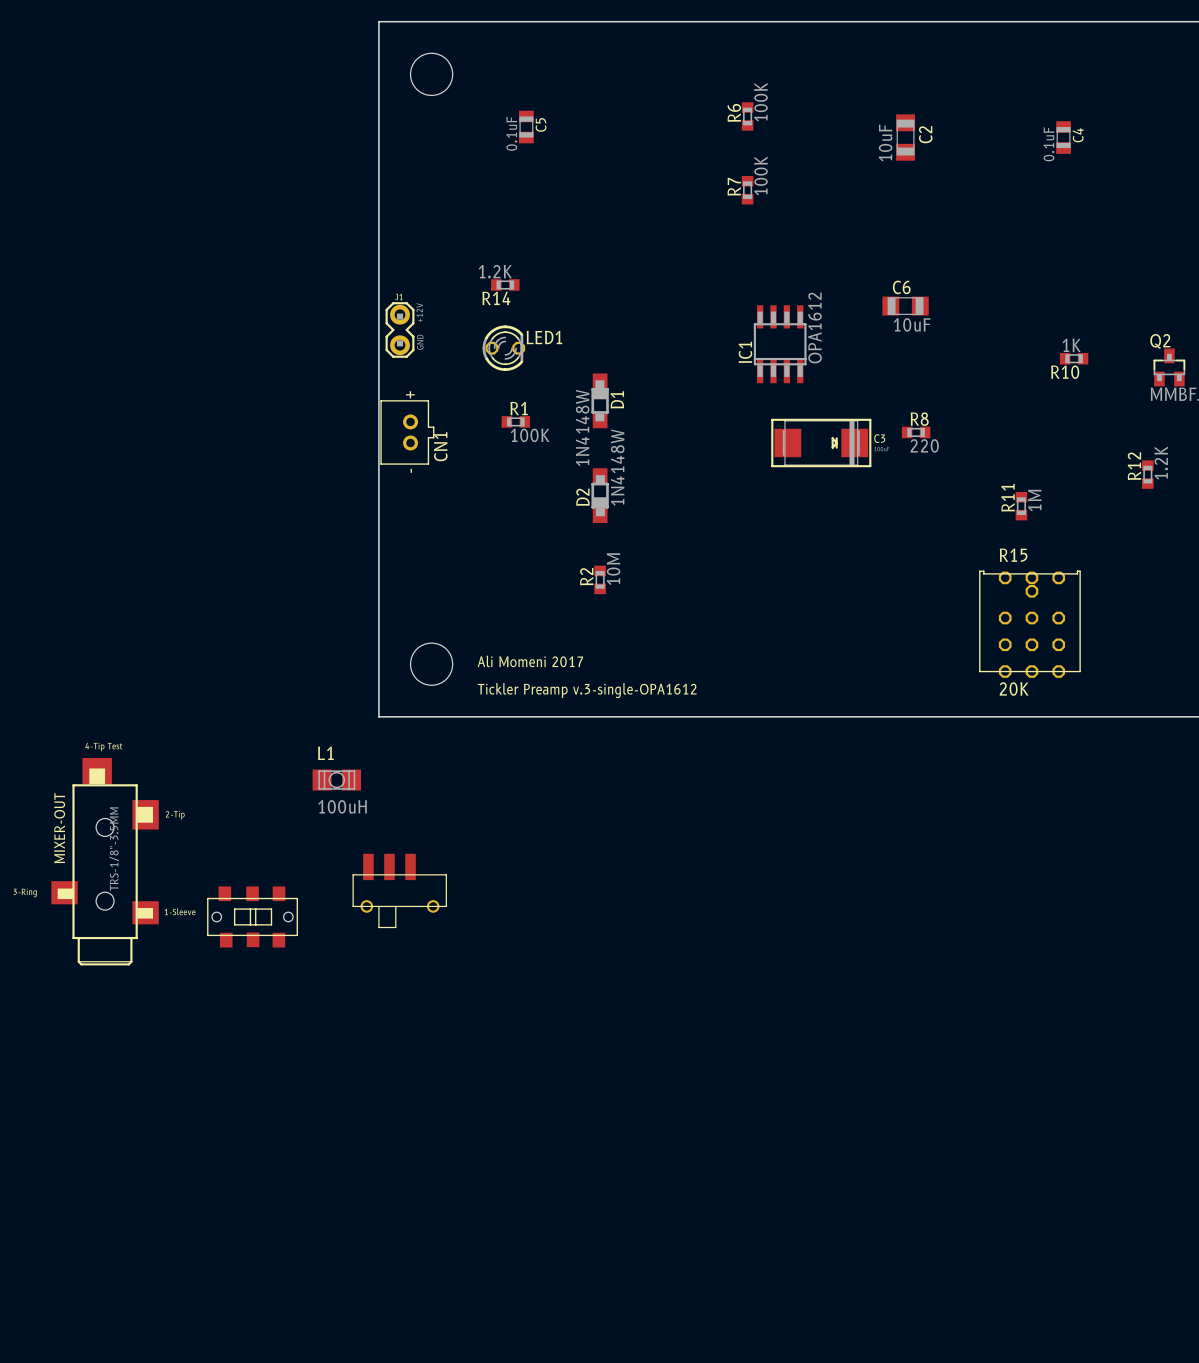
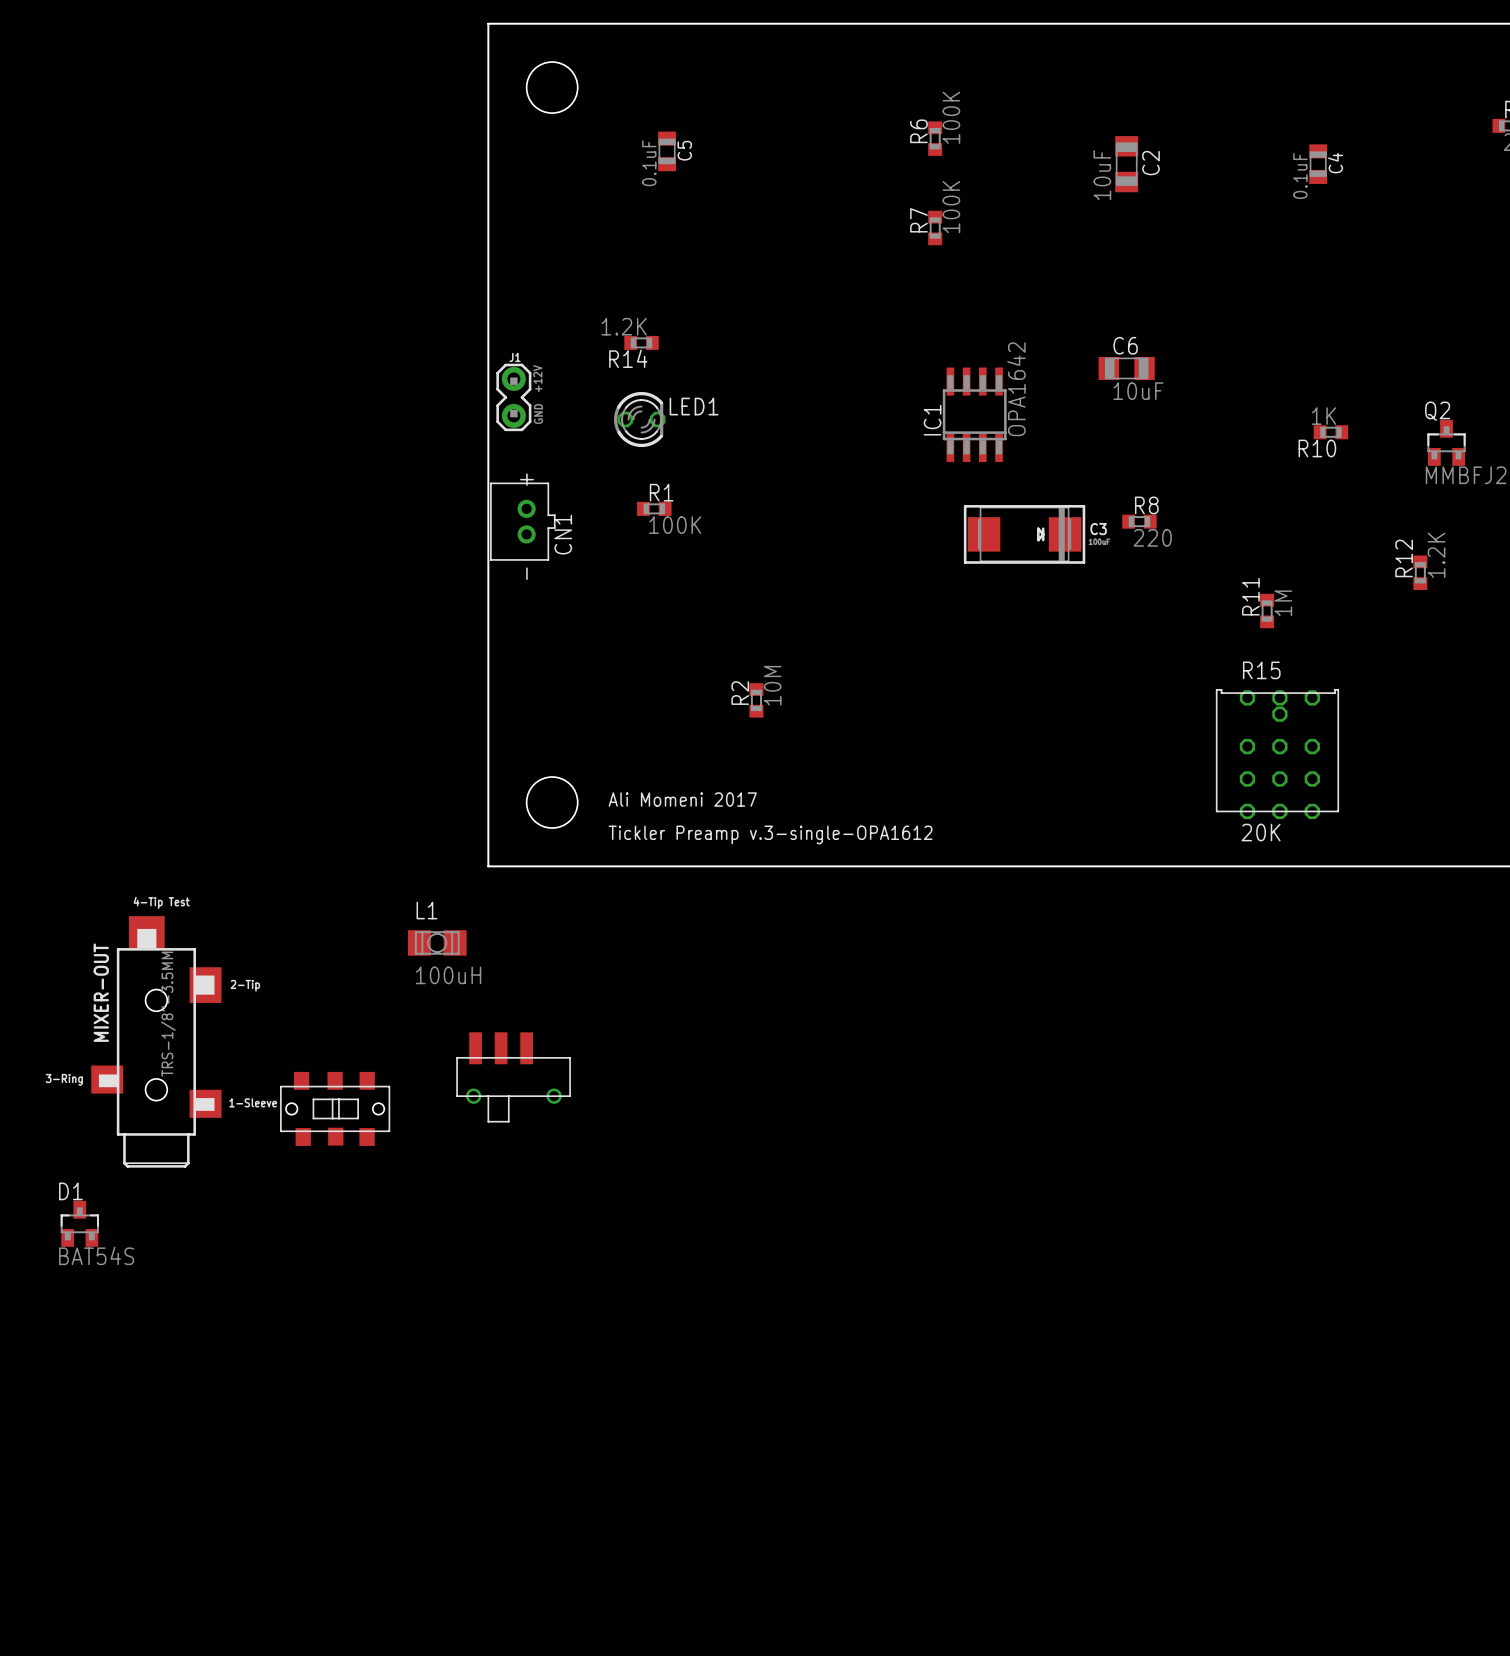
IC1 value: OPA1612 (815, 327) -> OPA1642 (1016, 389)
D1 footprint: [591, 373, 609, 429] -> [60, 1200, 99, 1247]
D1 name position: D1 (617, 399) -> D1 (70, 1191)
D1 value: 1N4148W (582, 428) -> BAT54S (96, 1255)
D2: 1N4148W (600, 495) -> none

